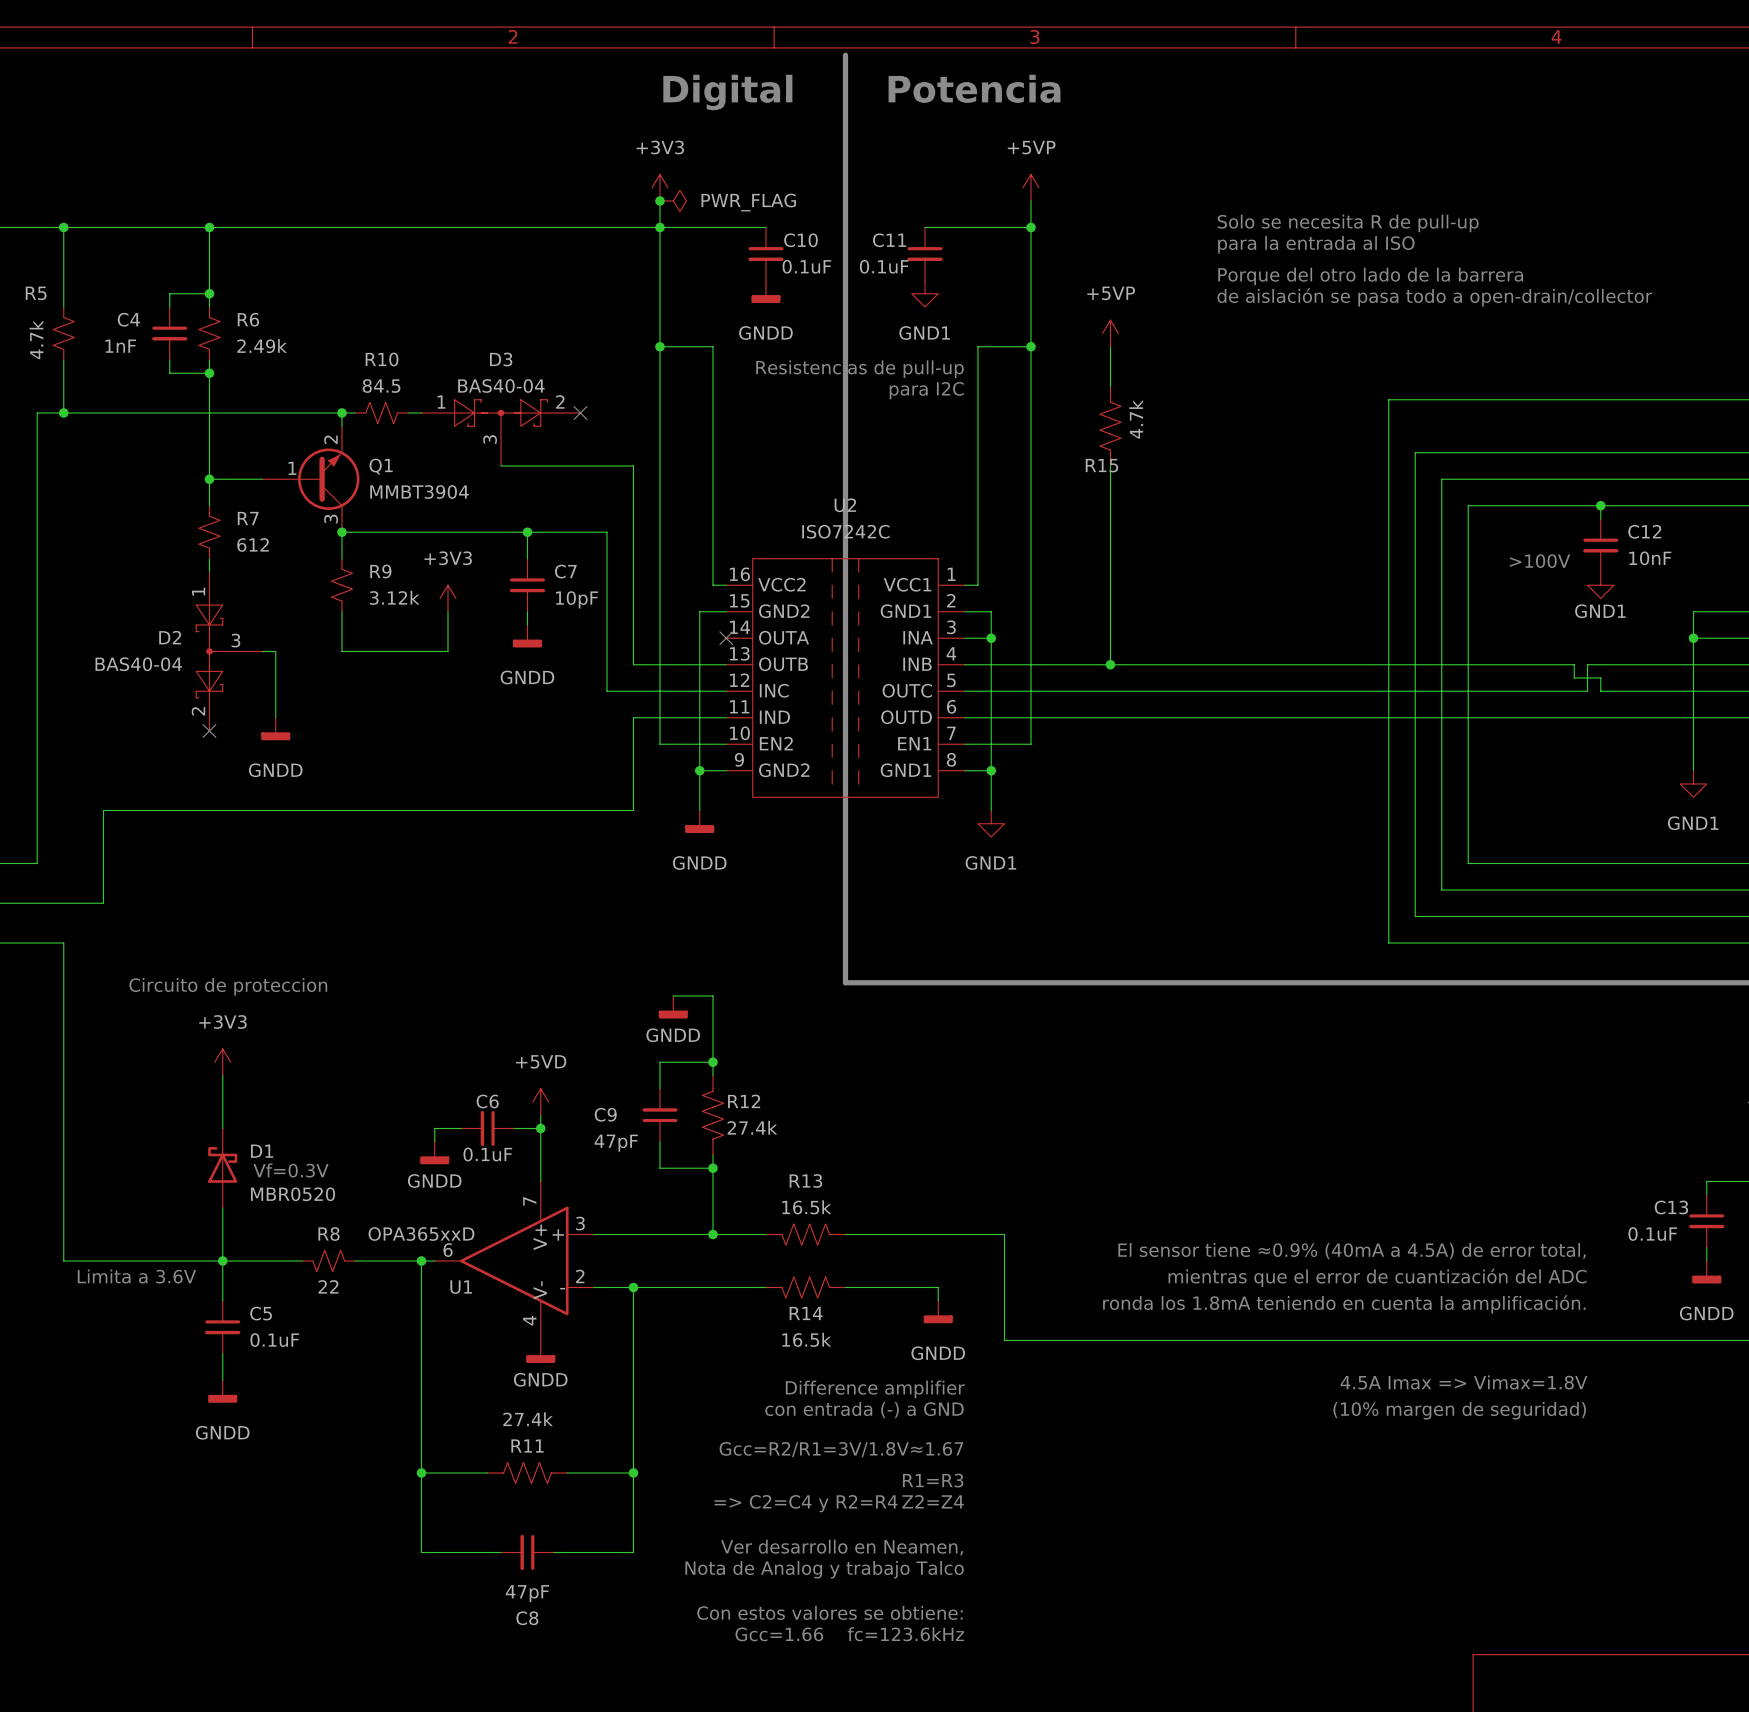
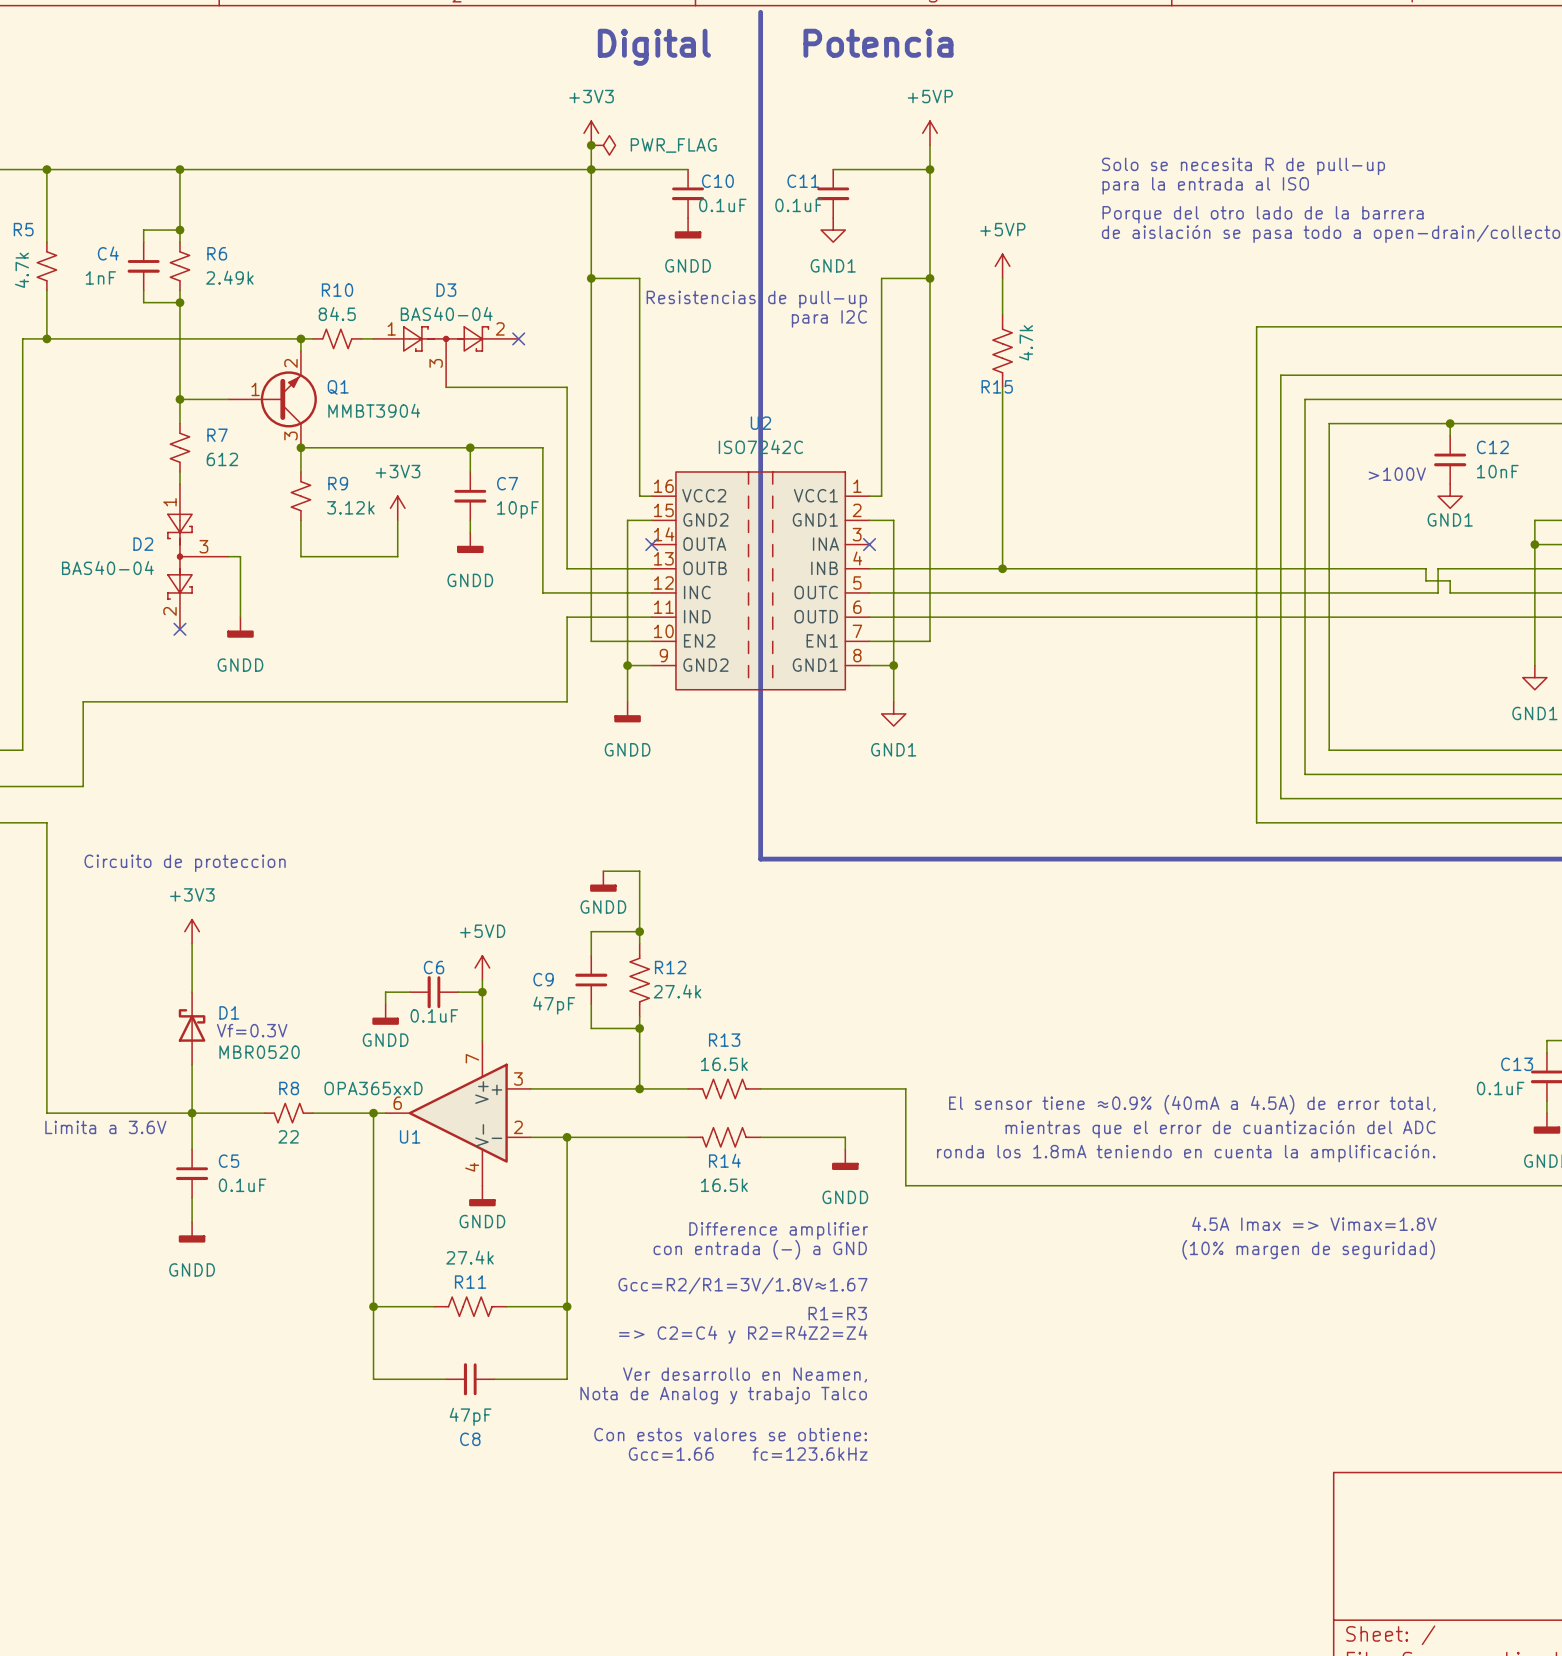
wire: (964, 638) (991, 638) -> none
no-connect mark: none -> (869, 544)
junction: (991, 638) -> none

